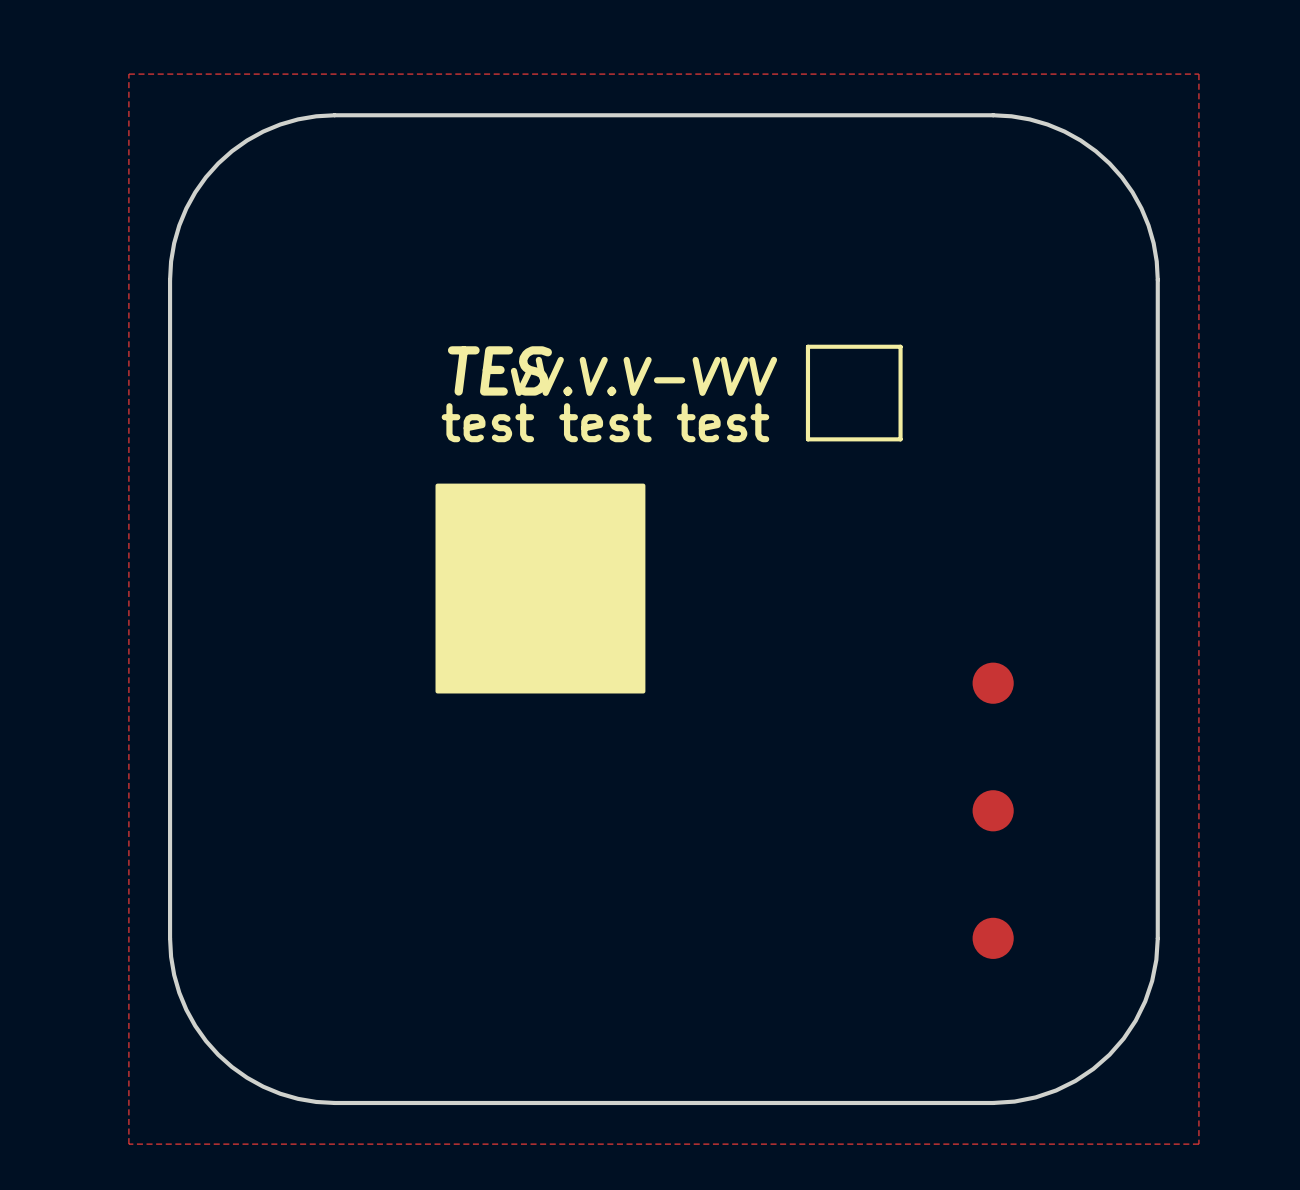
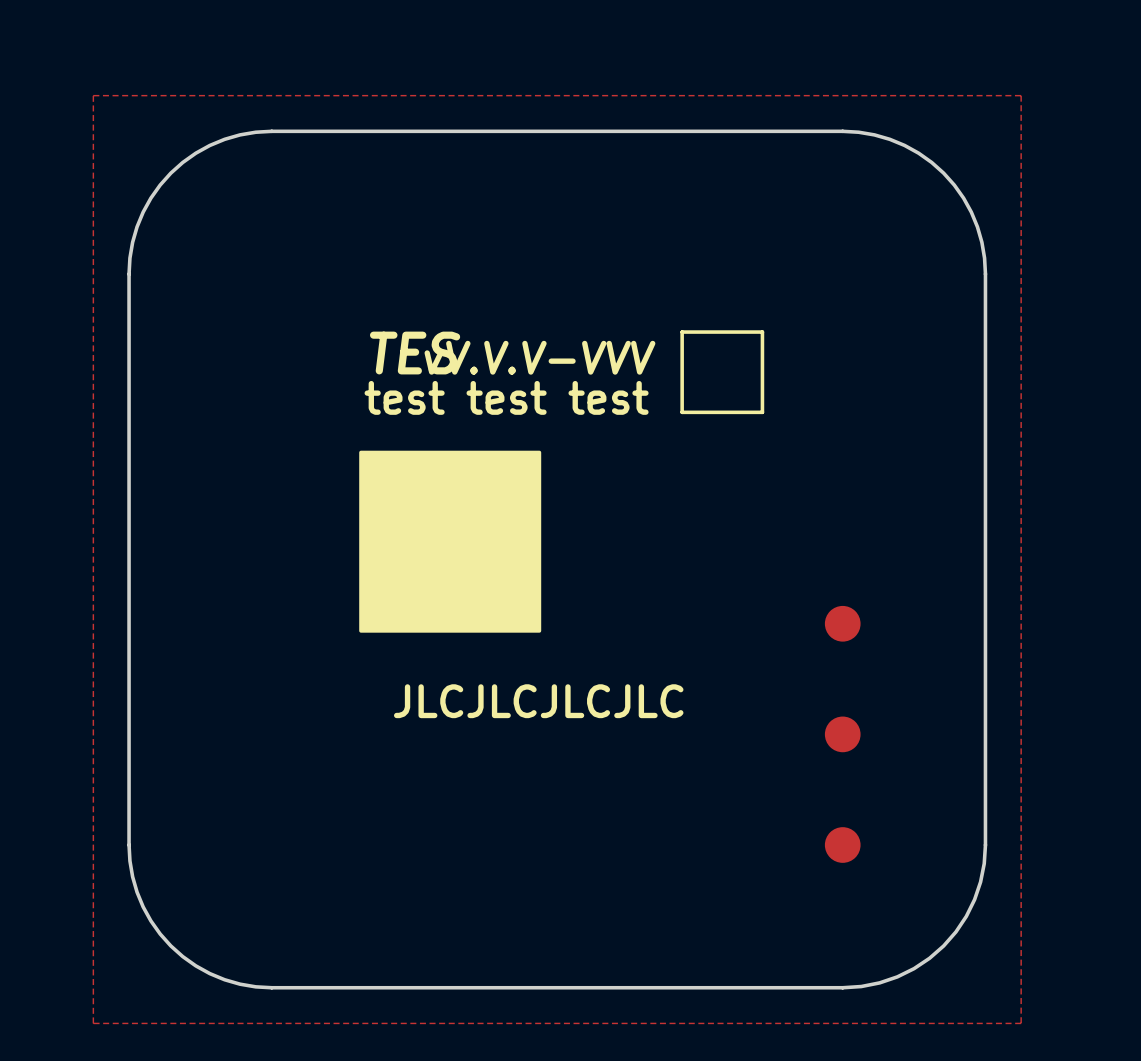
text: none -> JLCJLCJLCJLC (538, 701)

